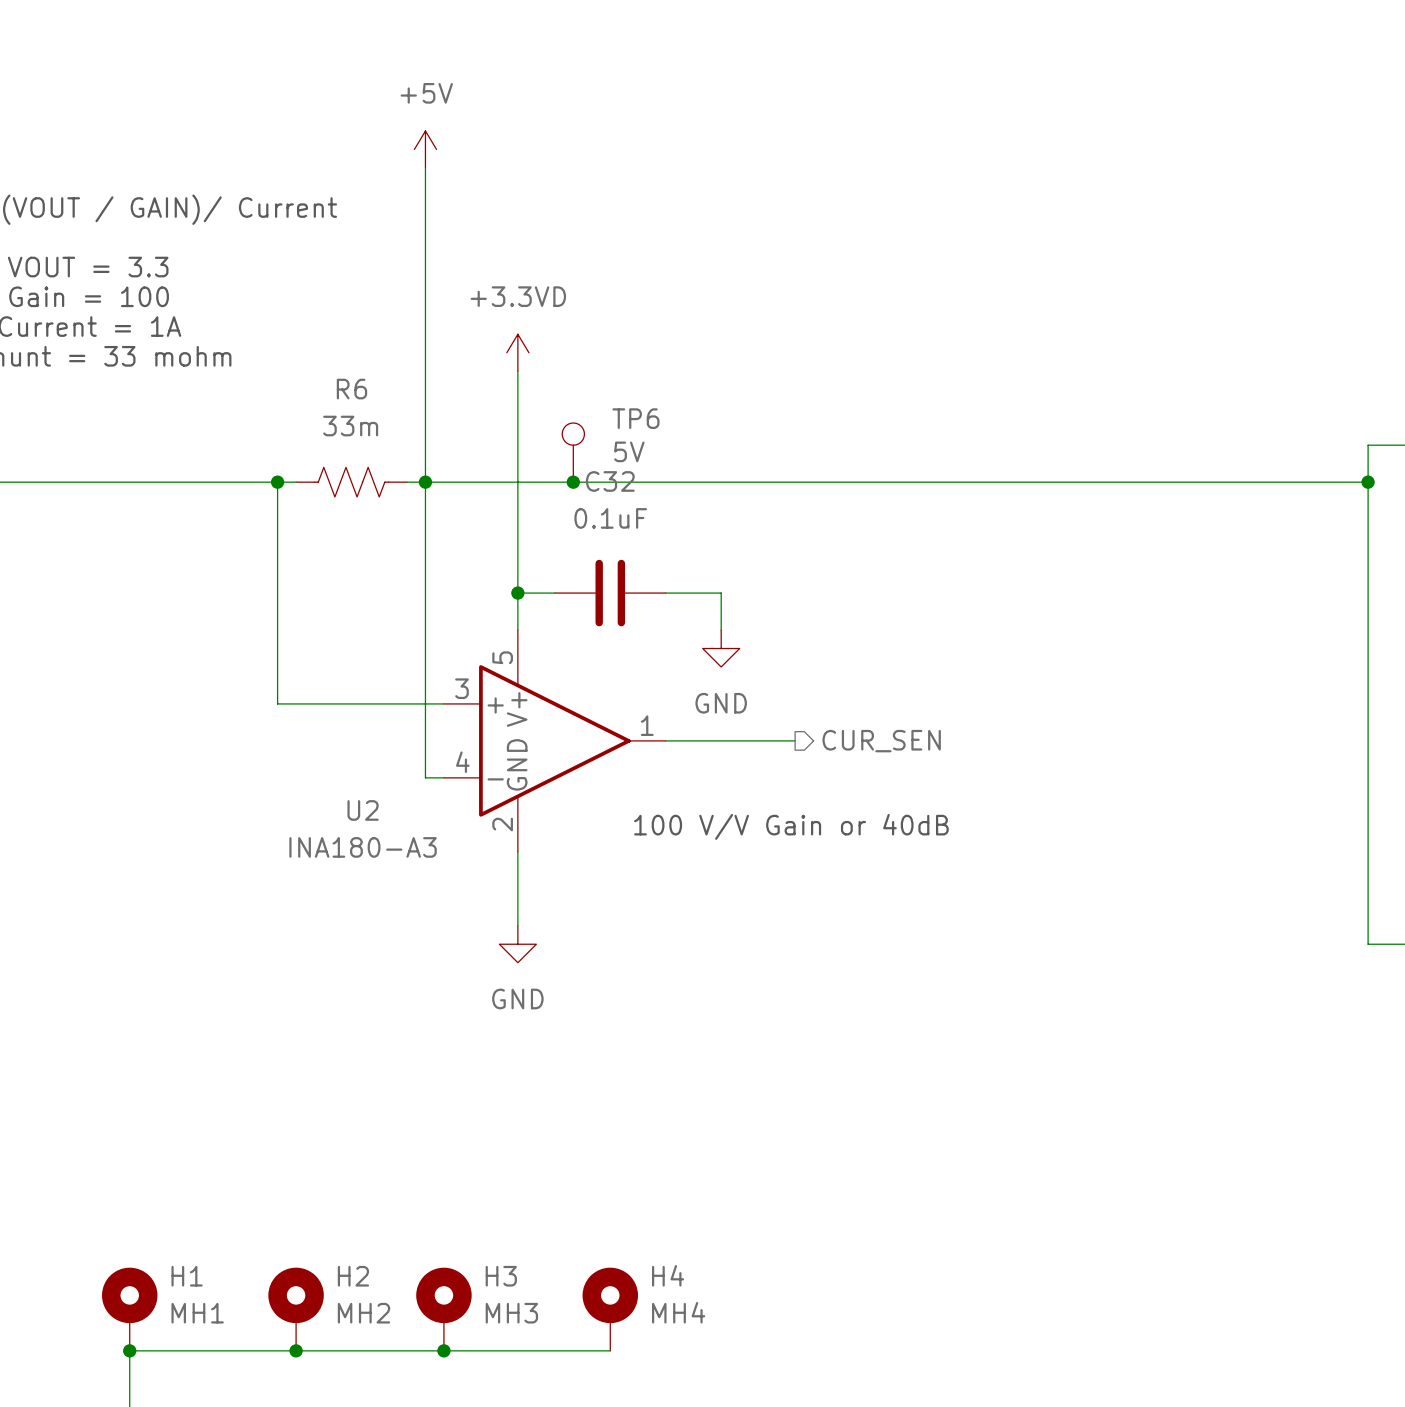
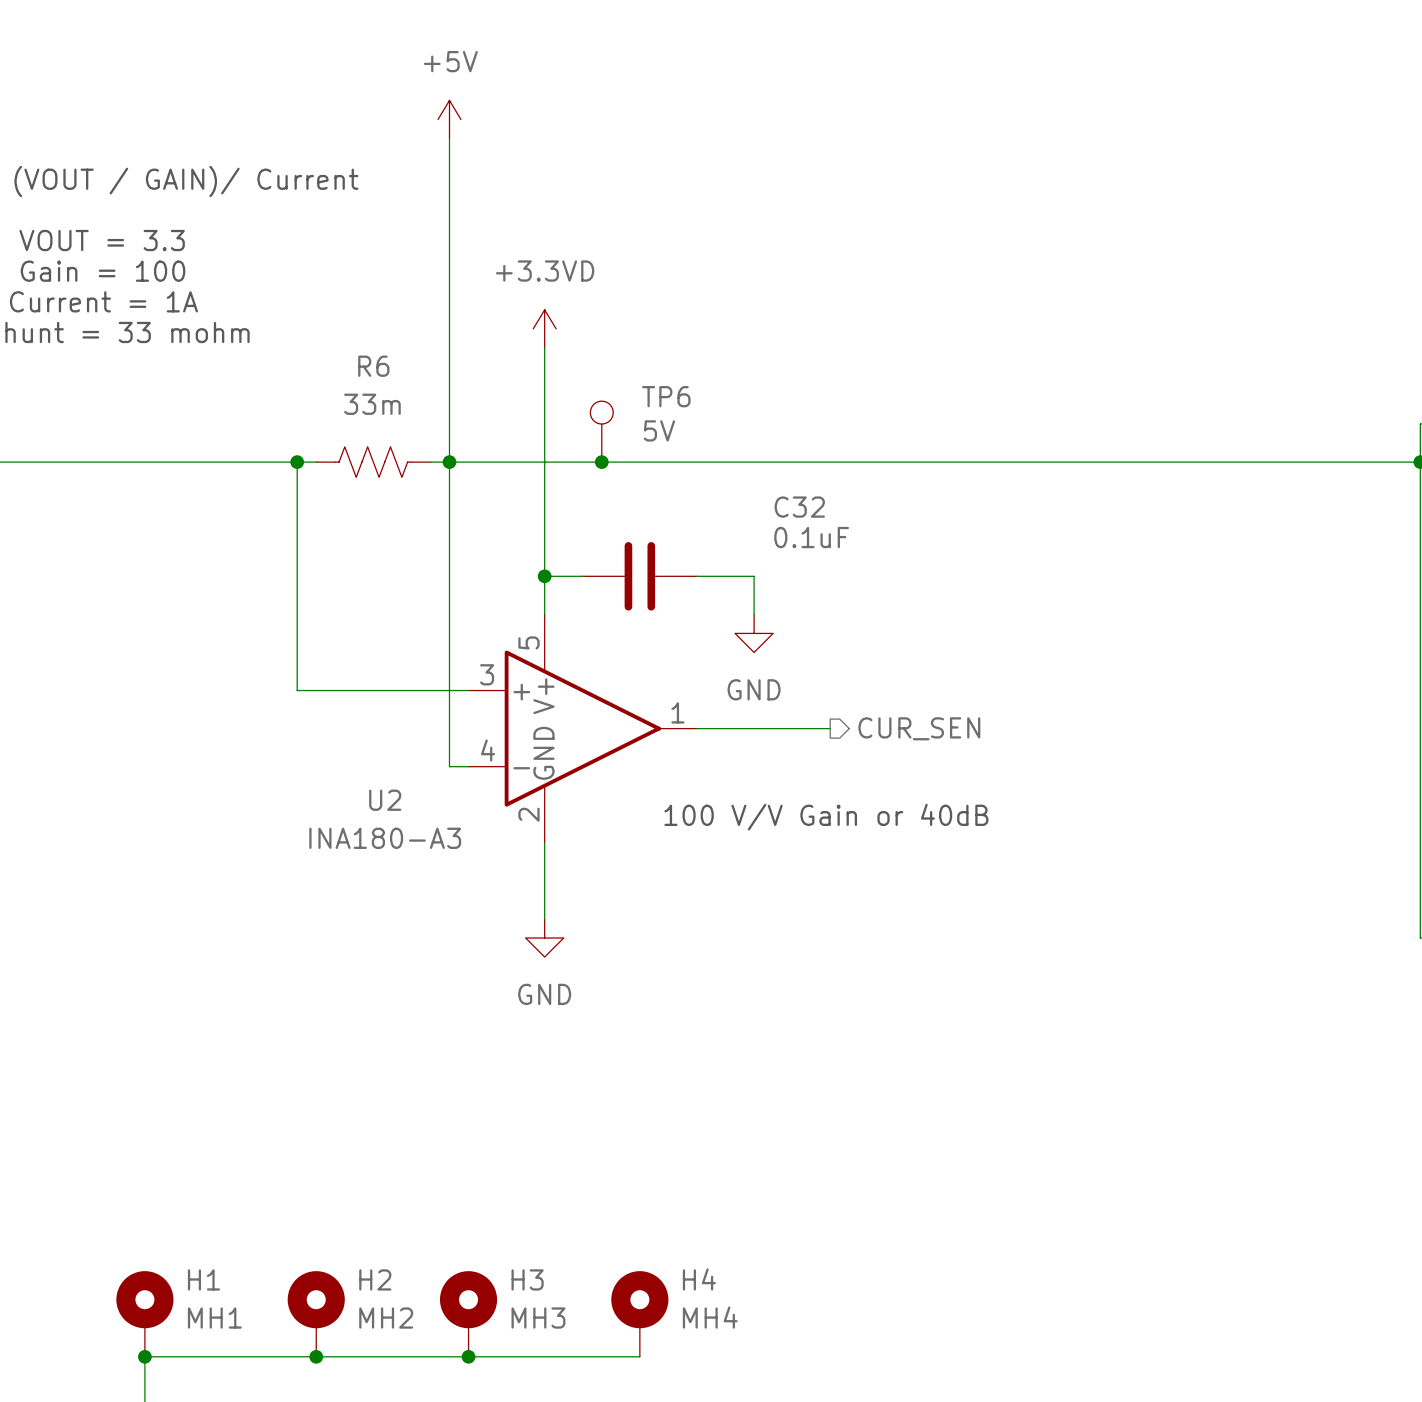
C32 name position: C32 (610, 481) -> C32 (799, 507)
C32 value position: 0.1uF (610, 518) -> 0.1uF (811, 537)

